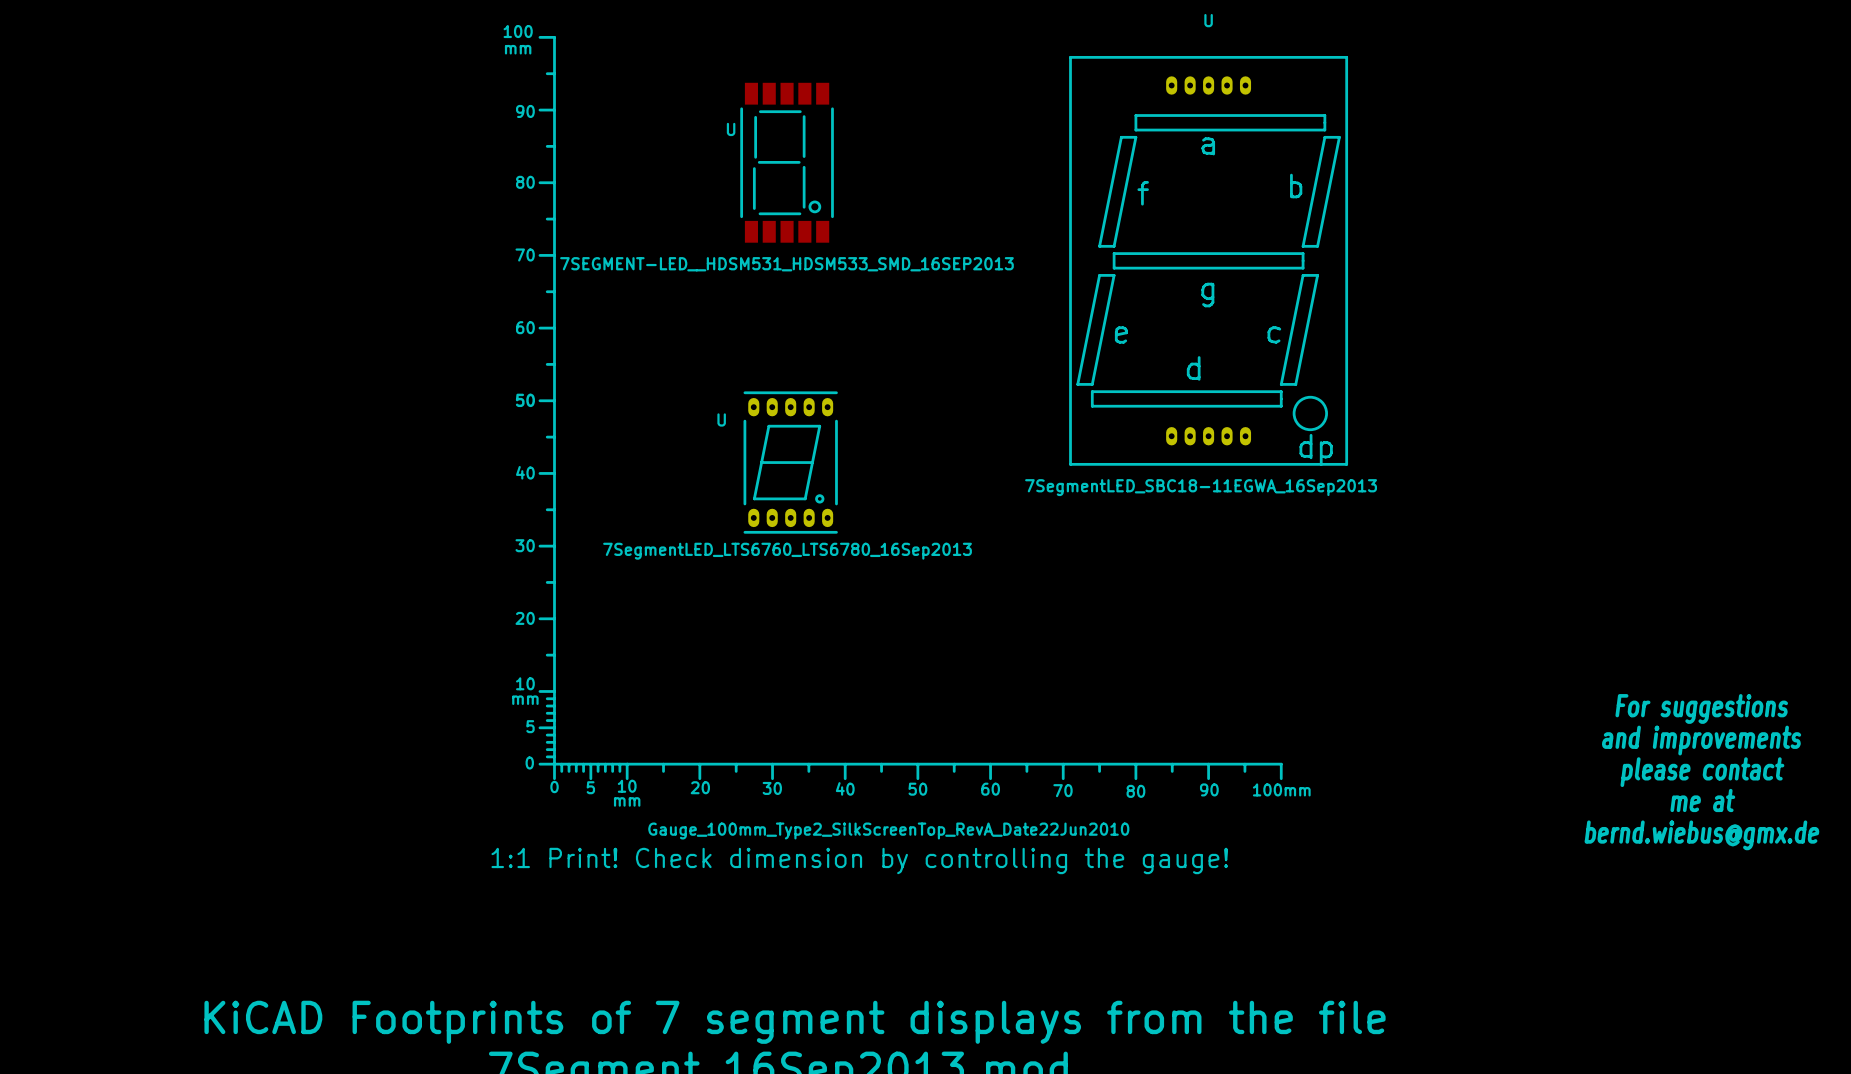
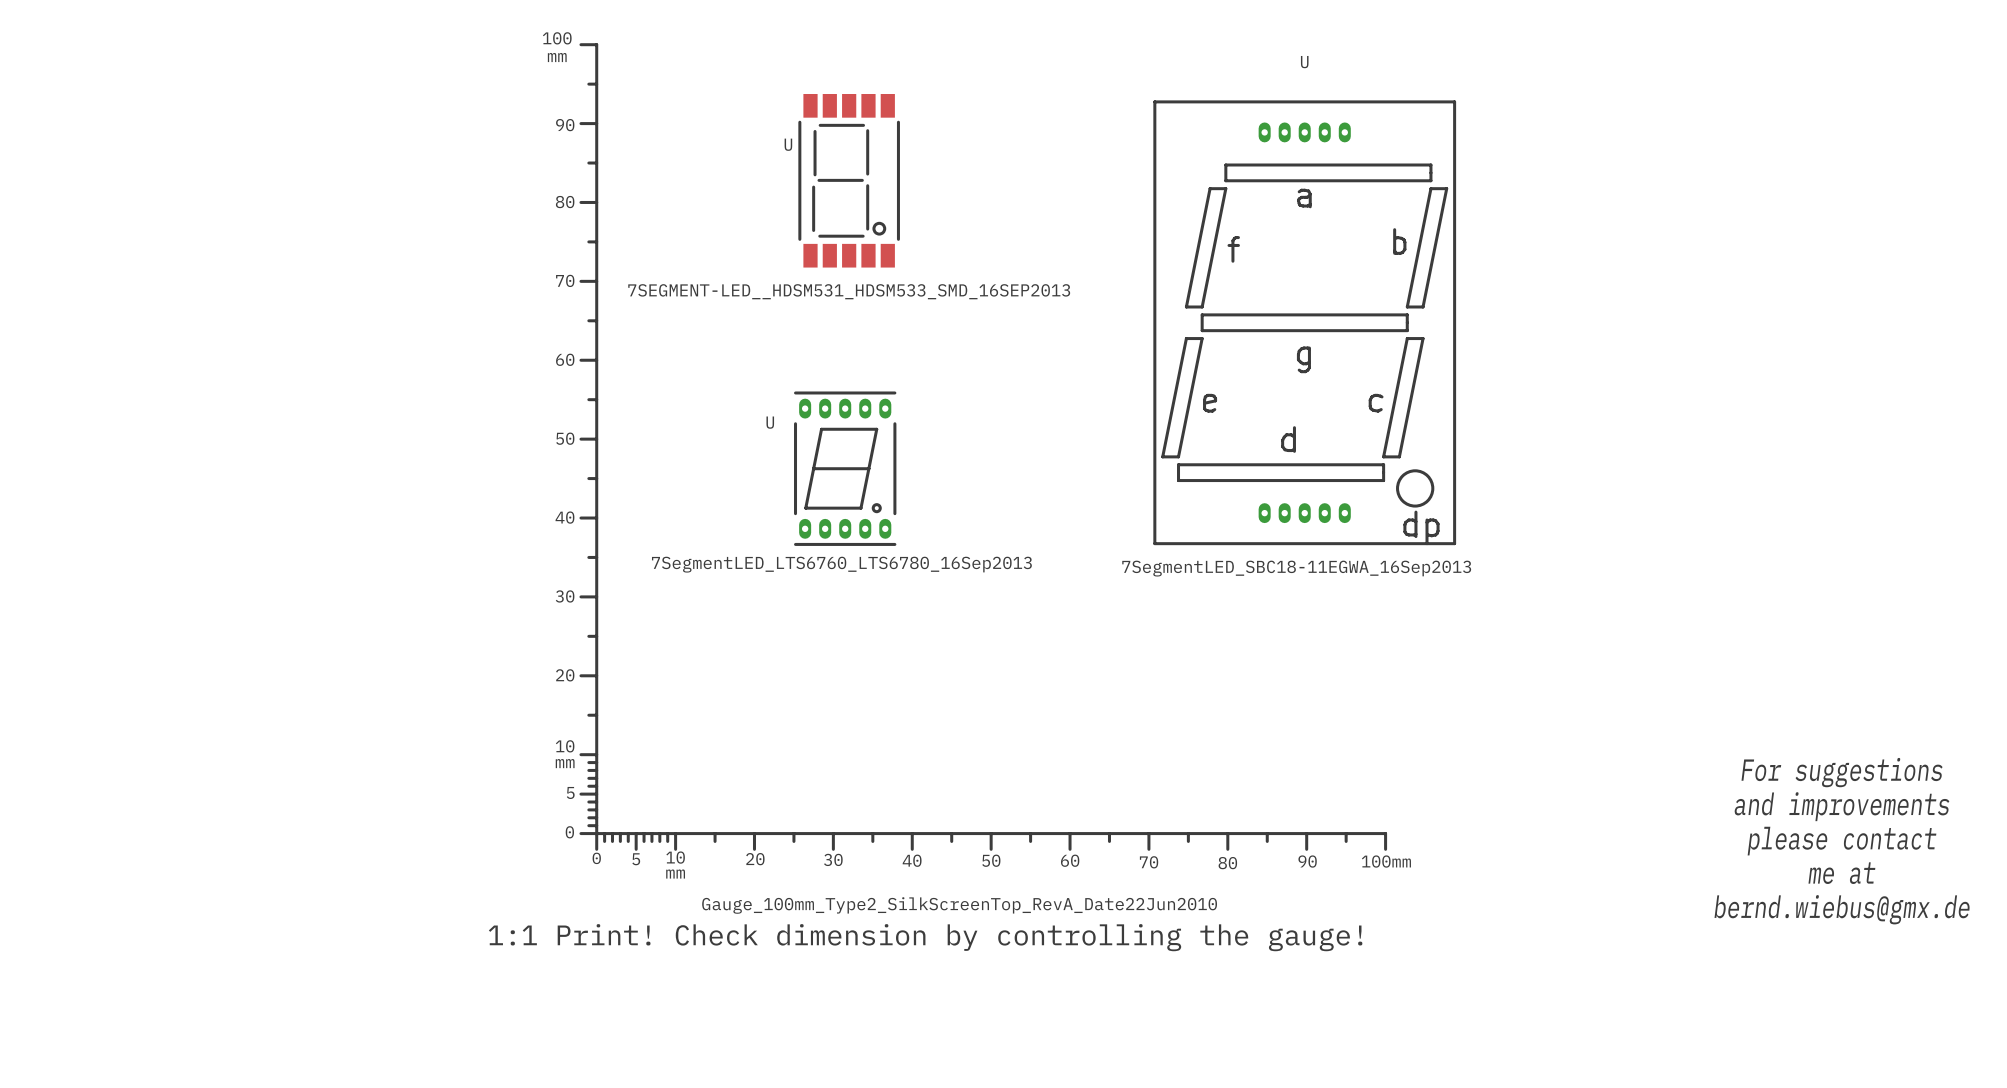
U position: (1208, 260) -> (1304, 322)
U position: (790, 462) -> (845, 468)

